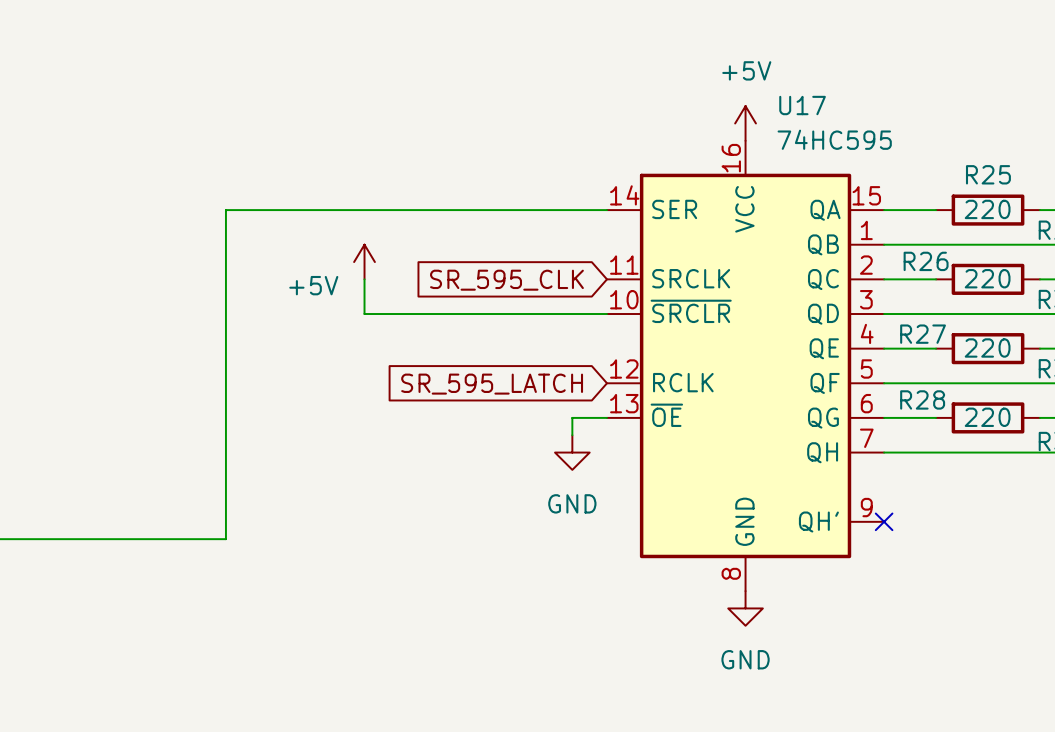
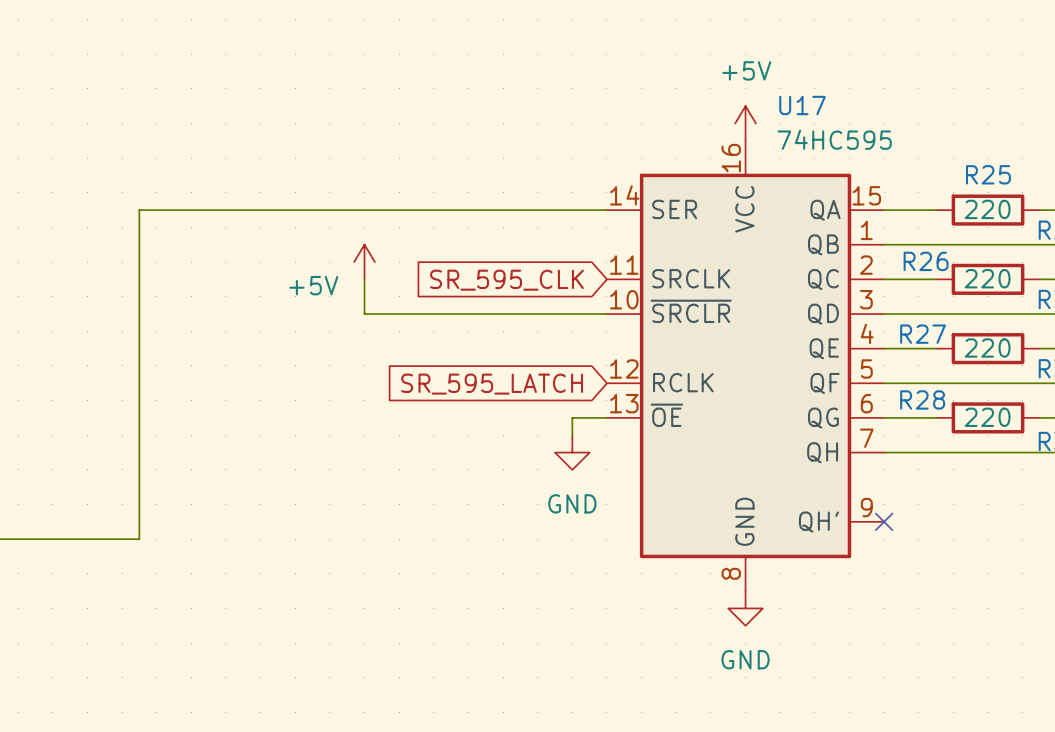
wire: (225, 210) (225, 539) (139, 539) -> (225, 210) (139, 210) (139, 539)

